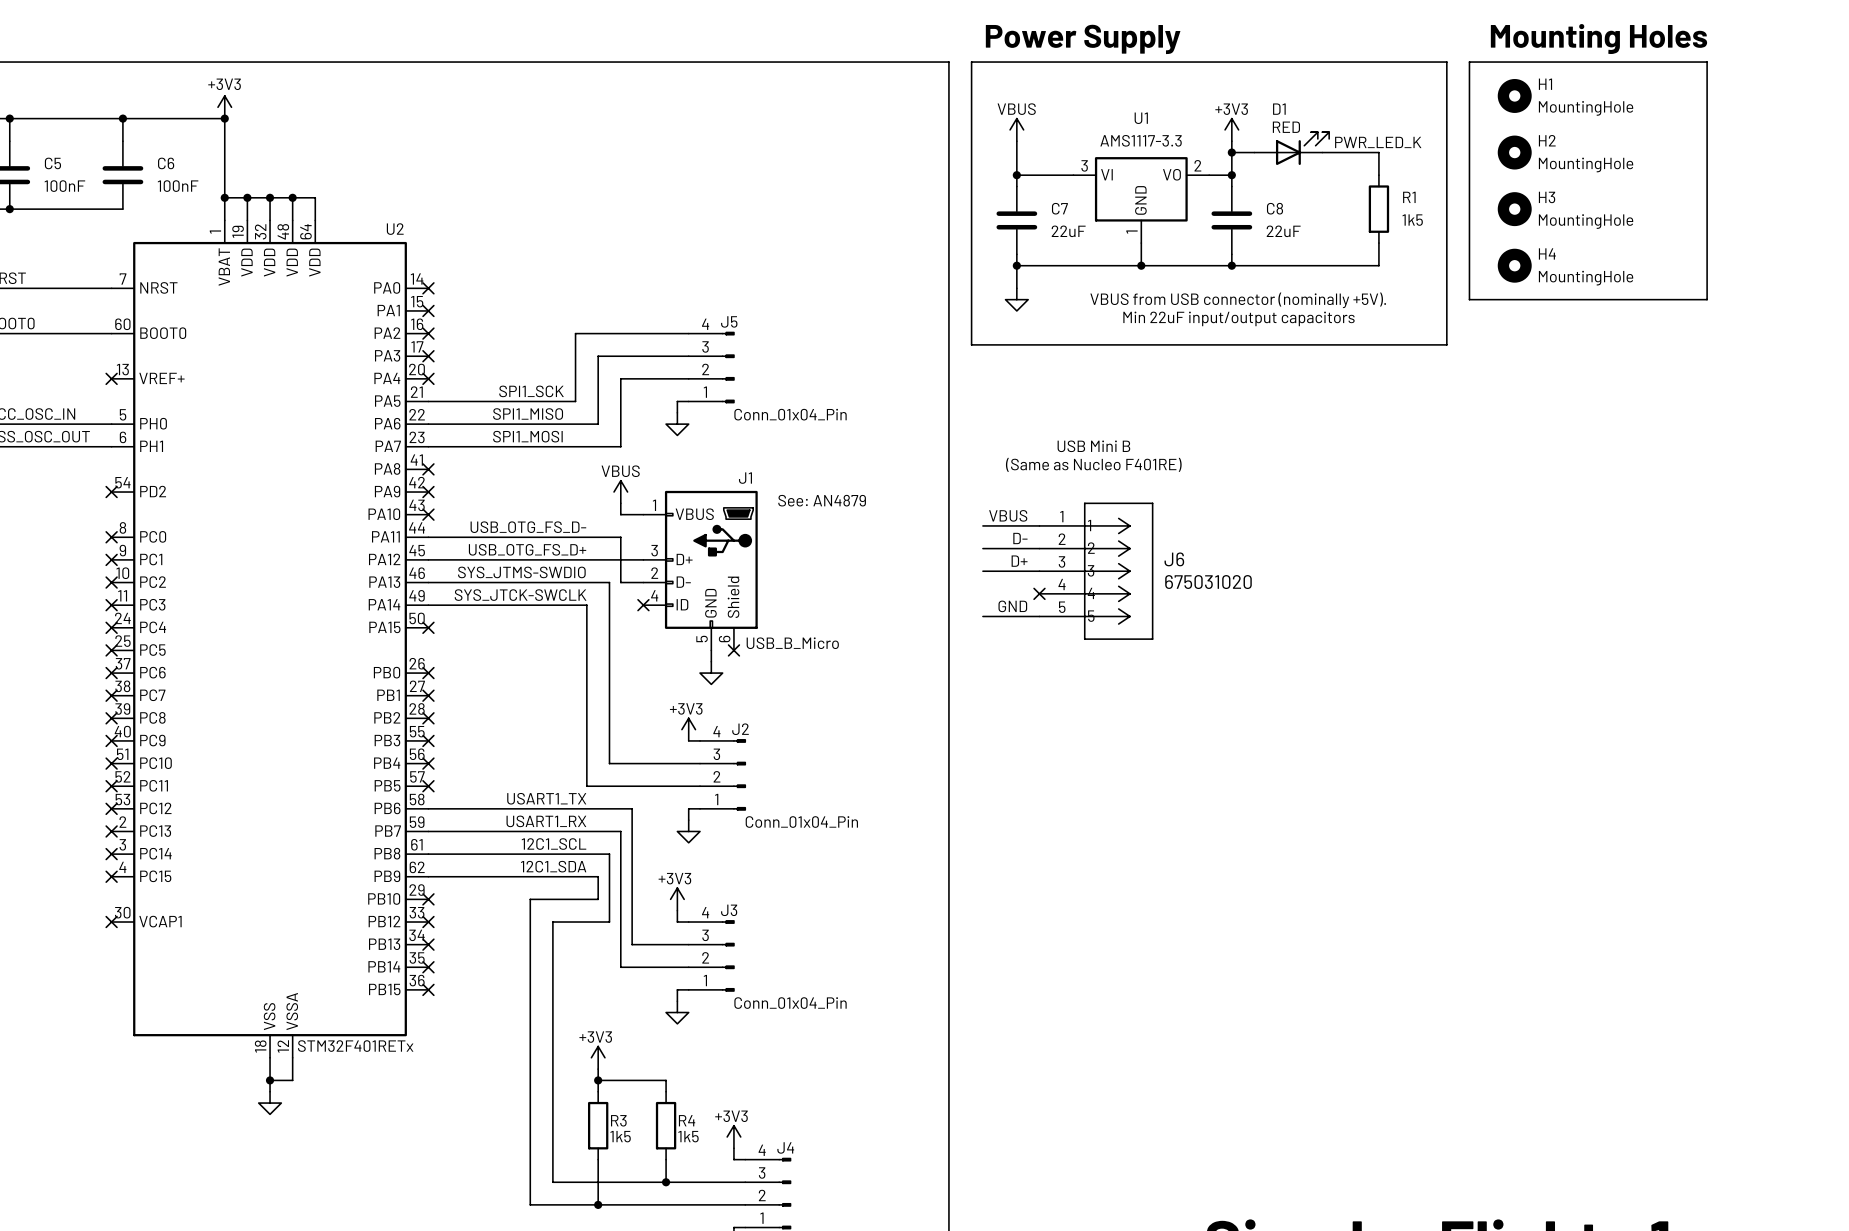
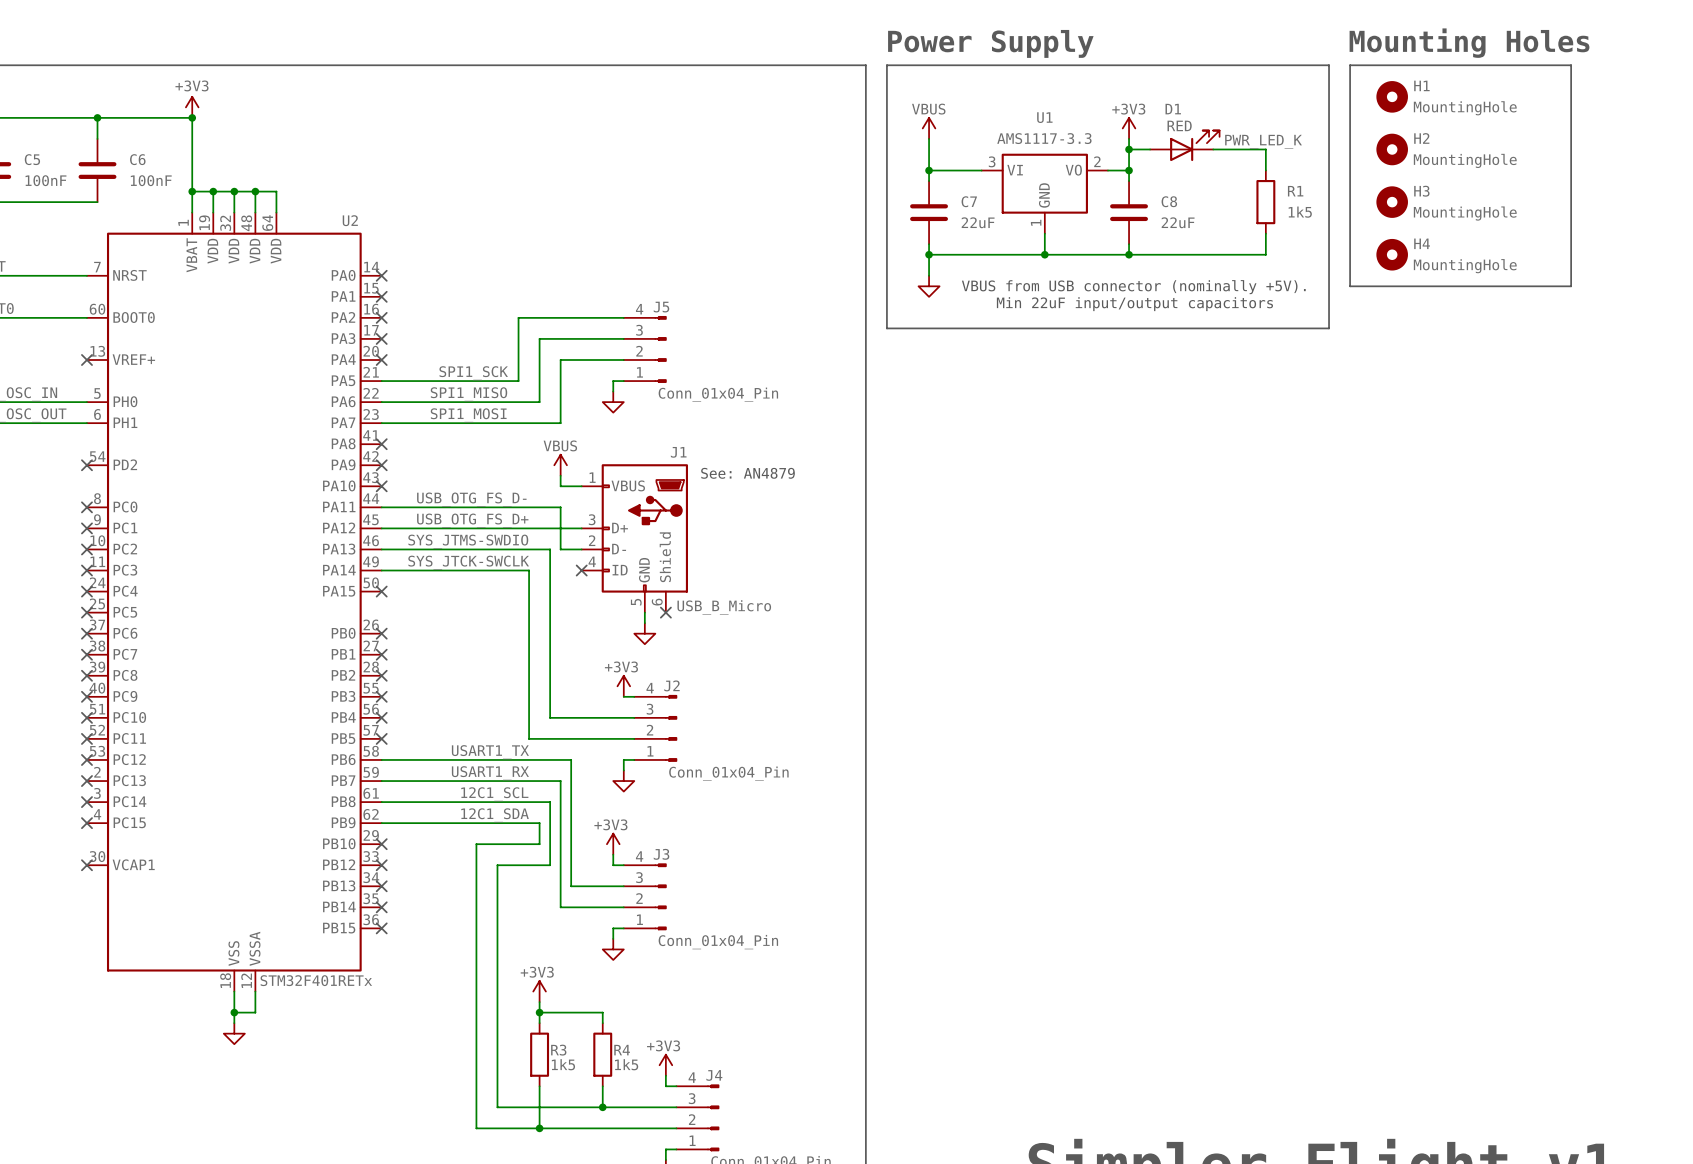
text: USB Mini B (1093, 446) -> none
text: (Same as Nucleo F401RE) (1093, 464) -> none
label: VBUS (1008, 515) -> none
wire: (982, 525) (1039, 525) -> none
label: D- (1020, 538) -> none
wire: (982, 548) (1039, 548) -> none
label: D+ (1019, 561) -> none
wire: (982, 571) (1039, 571) -> none
J6: 675031020 (1096, 571) -> none
no-connect mark: (1039, 593) -> none
label: GND (1012, 606) -> none
wire: (982, 616) (1039, 616) -> none

